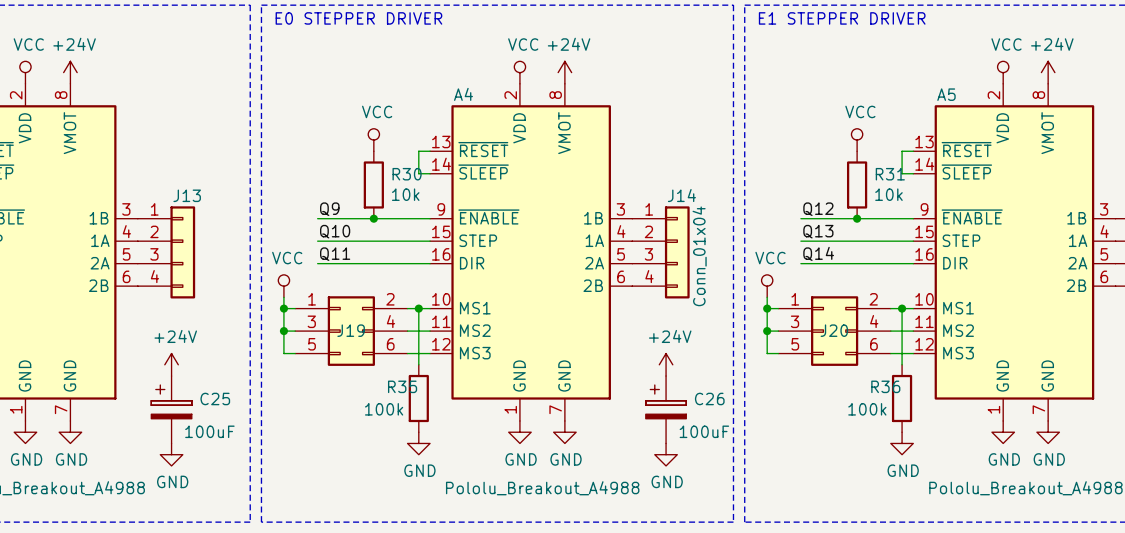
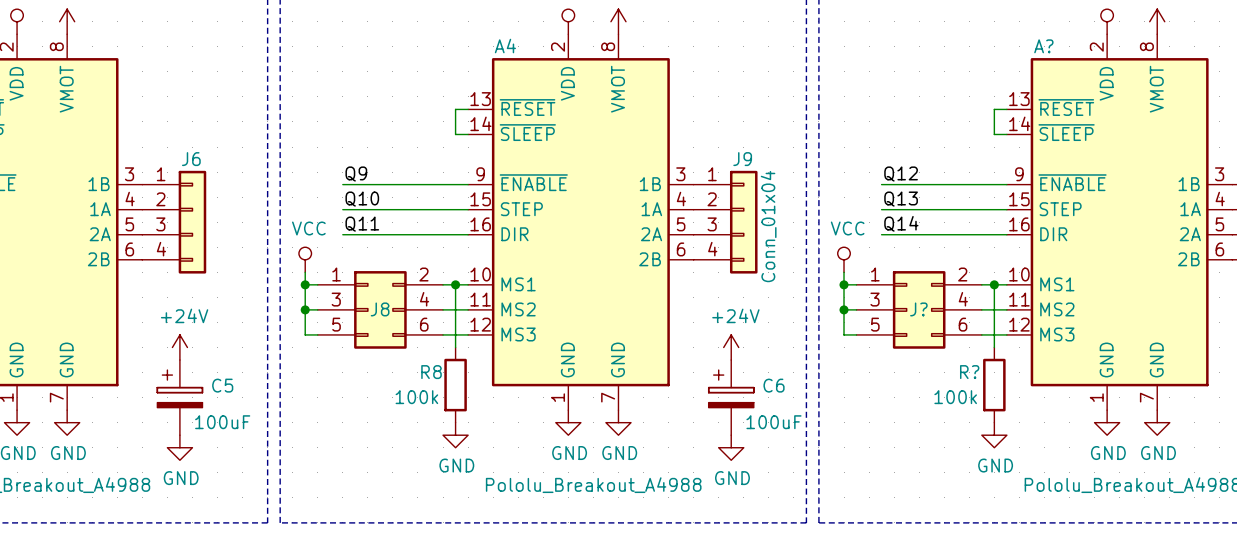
A5 name: A5 (946, 94) -> A? (1043, 46)
power symbol: VCC (373, 140) -> none
power symbol: VCC (857, 140) -> none
R30: 10k (373, 184) -> none
R31: 10k (857, 184) -> none
J13 name: J13 (187, 195) -> J6 (191, 159)
J14 name: J14 (681, 195) -> J9 (742, 159)
junction: (373, 218) -> none
junction: (857, 218) -> none
J19 name: J19 (351, 330) -> J8 (380, 309)
J20 name: J20 (834, 330) -> J? (918, 309)
R35 name: R35 (402, 386) -> R8 (431, 372)
R36 name: R36 (885, 386) -> R? (969, 372)
C25 name: C25 (215, 398) -> C5 (222, 385)
C26 name: C26 (709, 398) -> C6 (774, 385)

